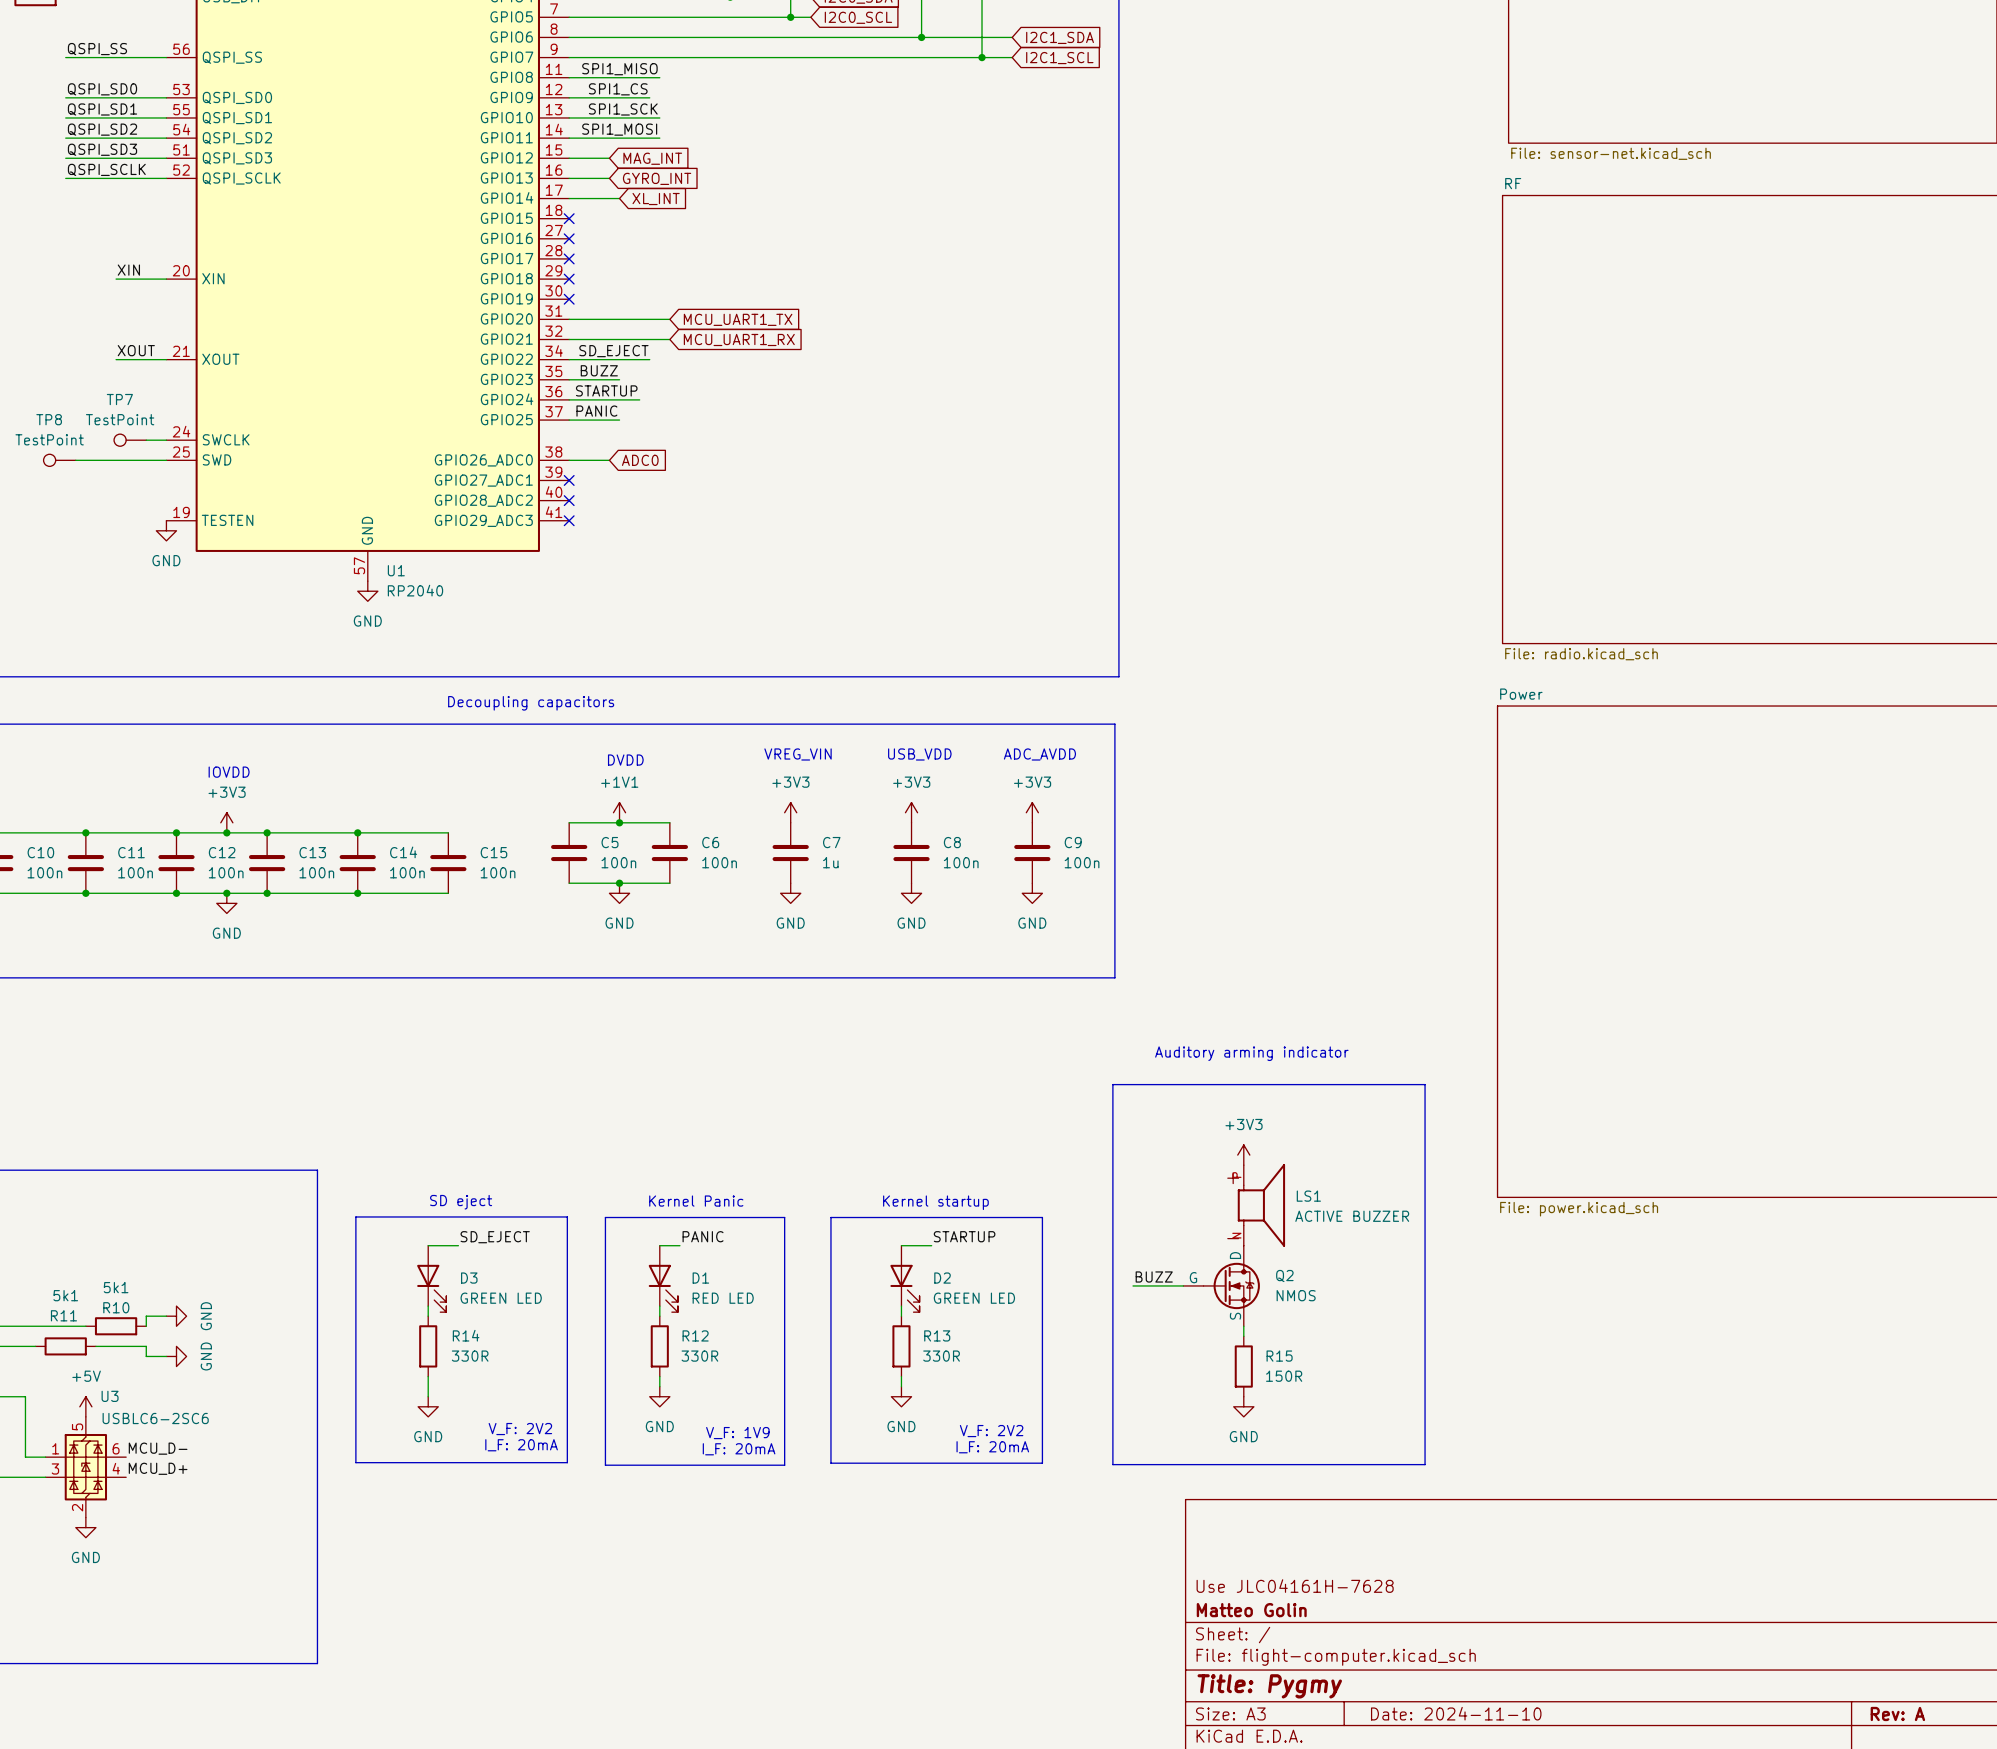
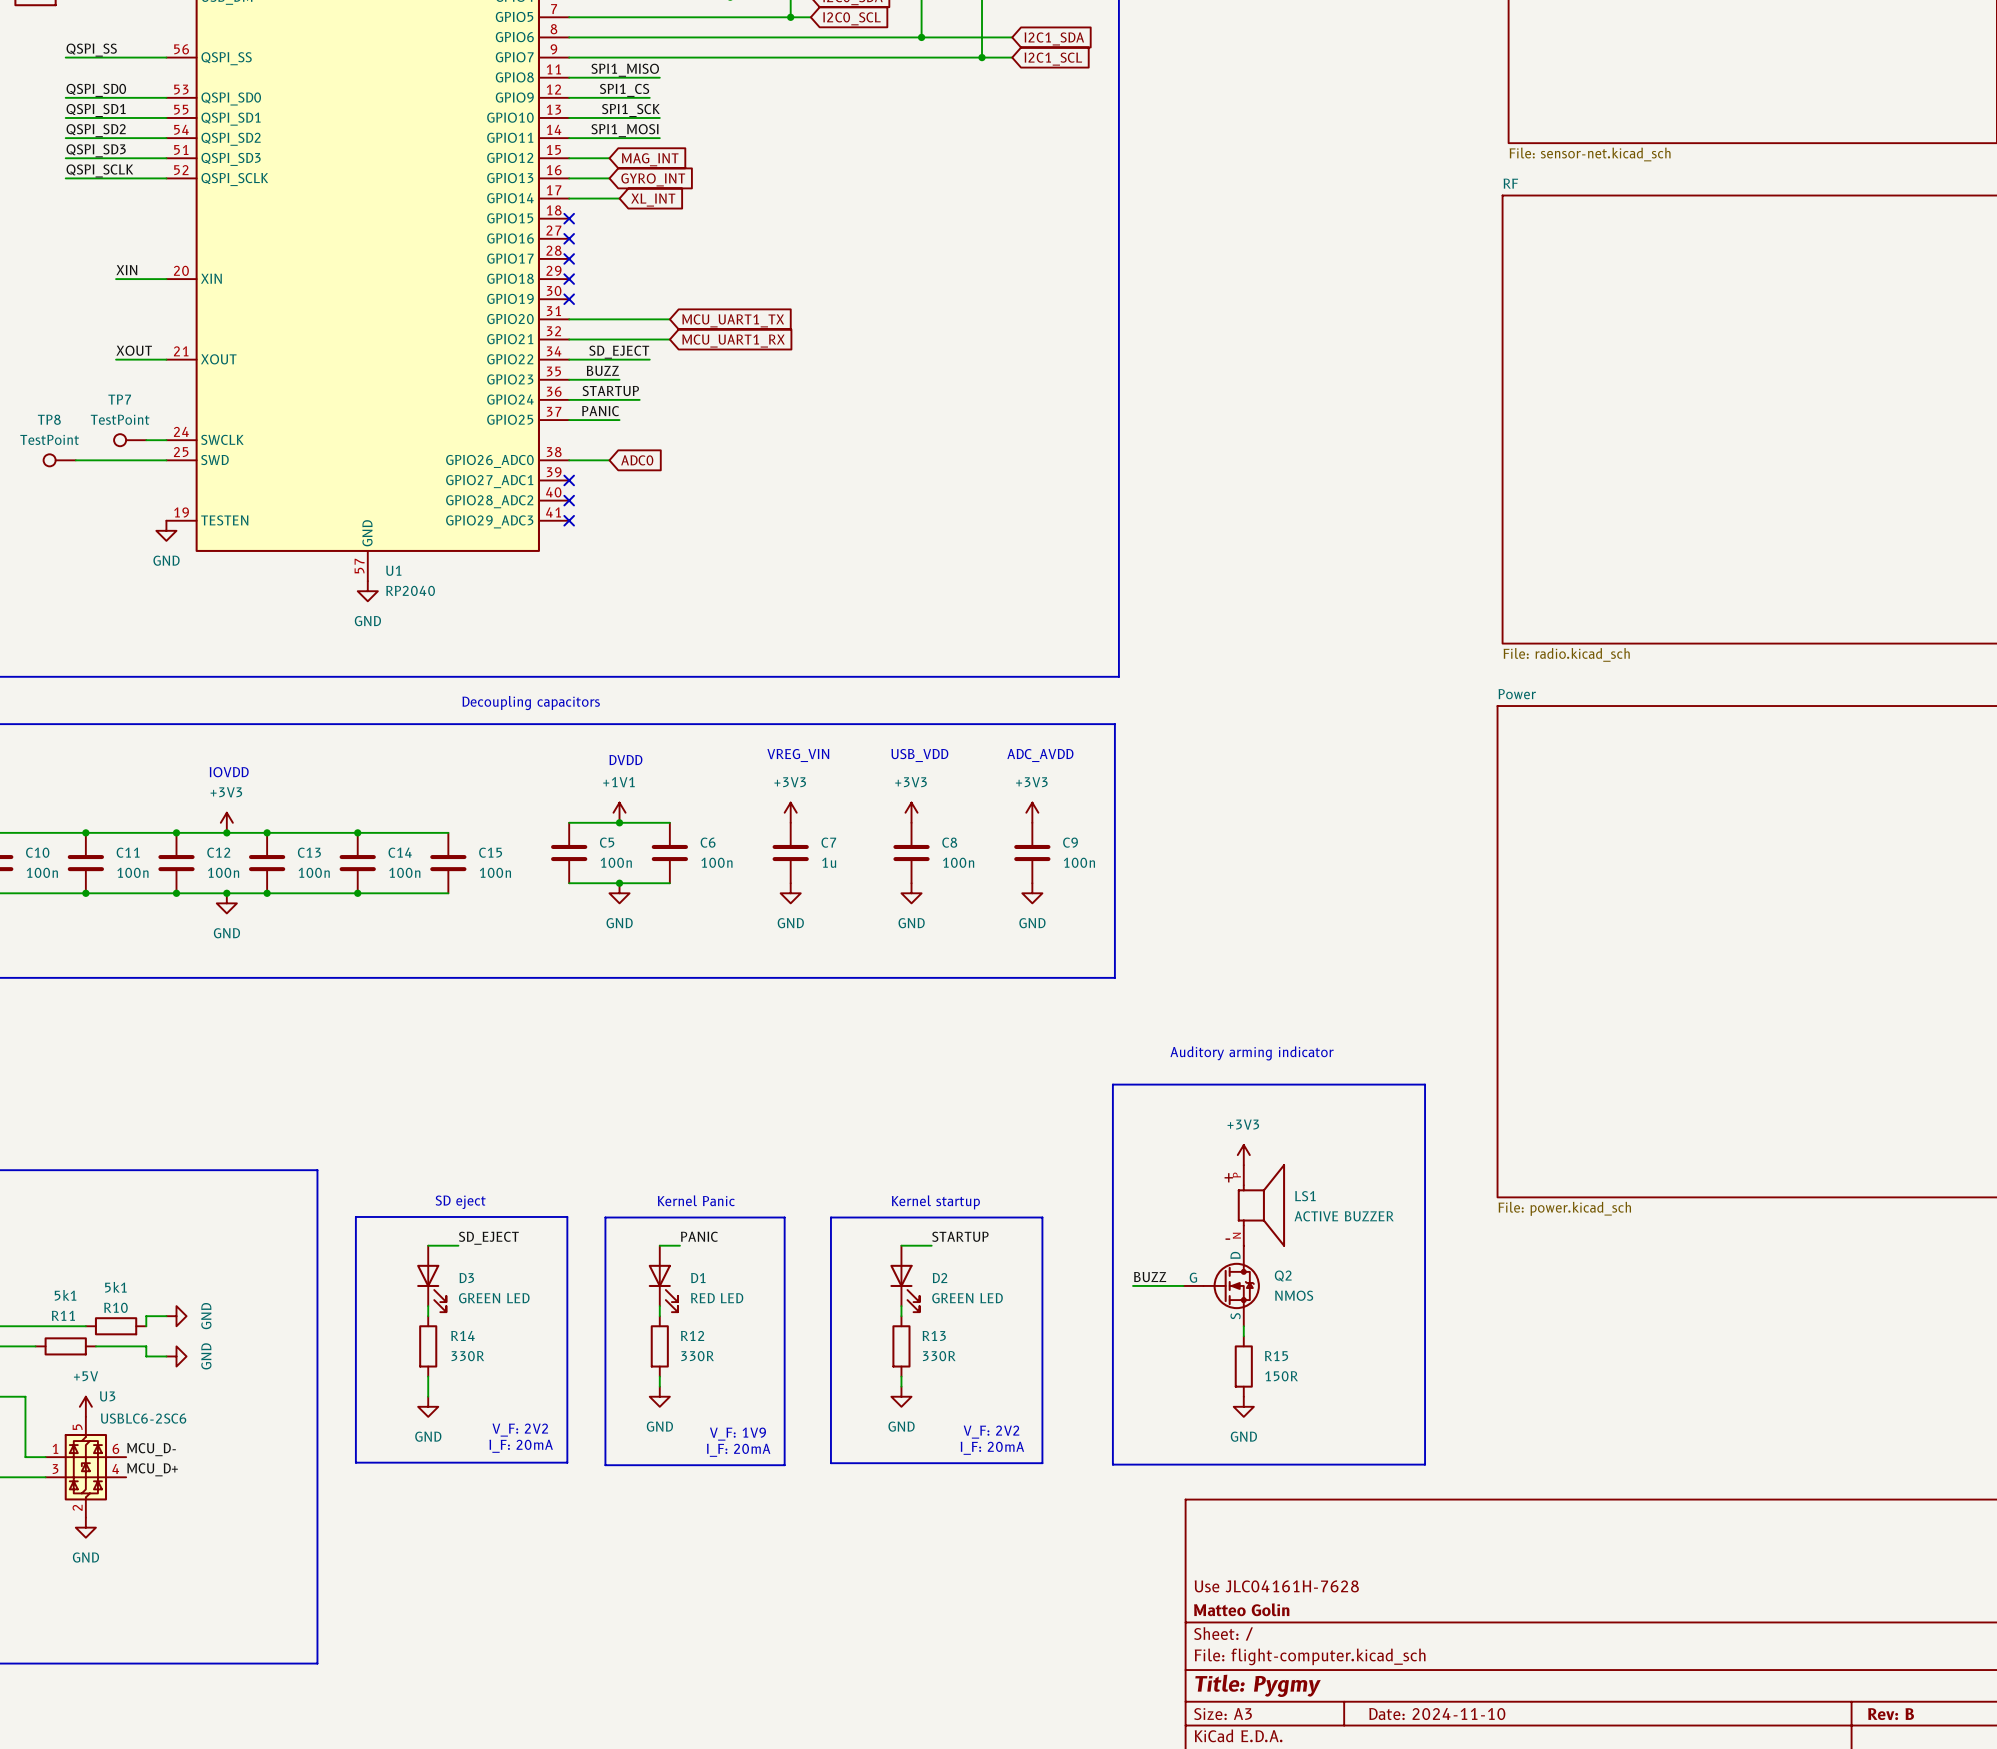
title block: Rev: A (1897, 1713) -> Rev: B (1891, 1714)

